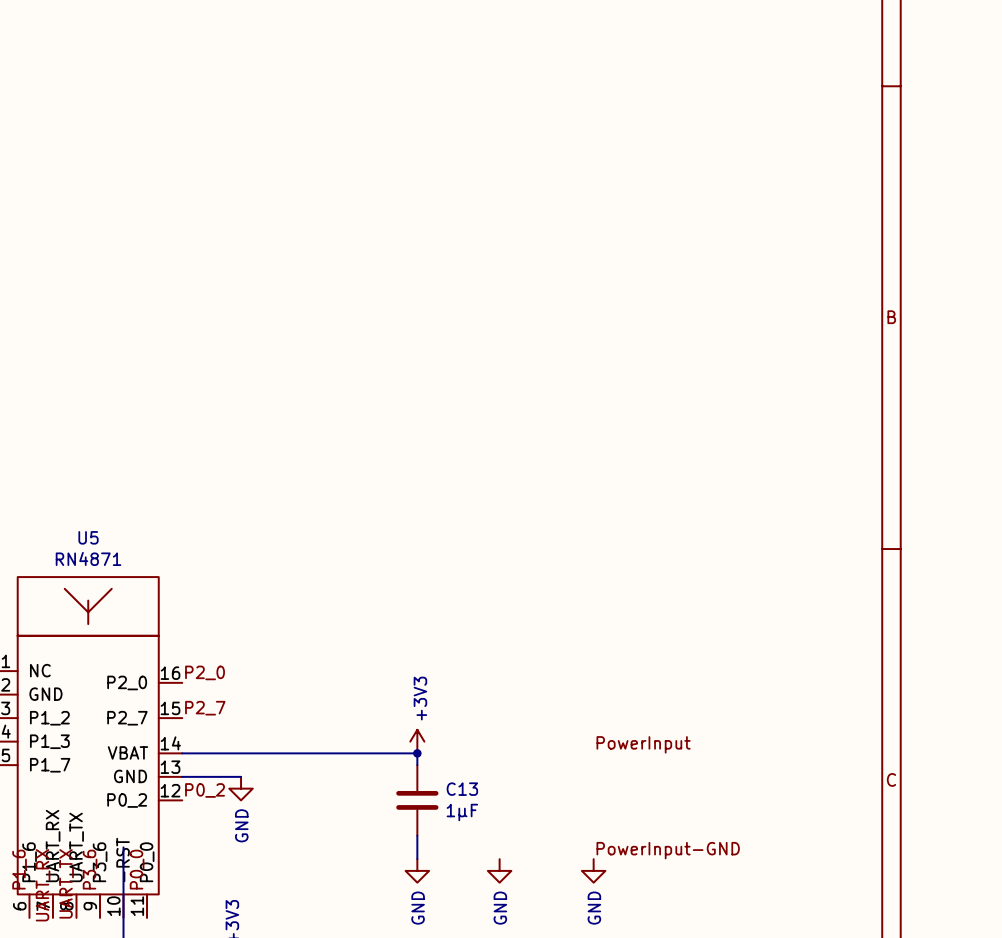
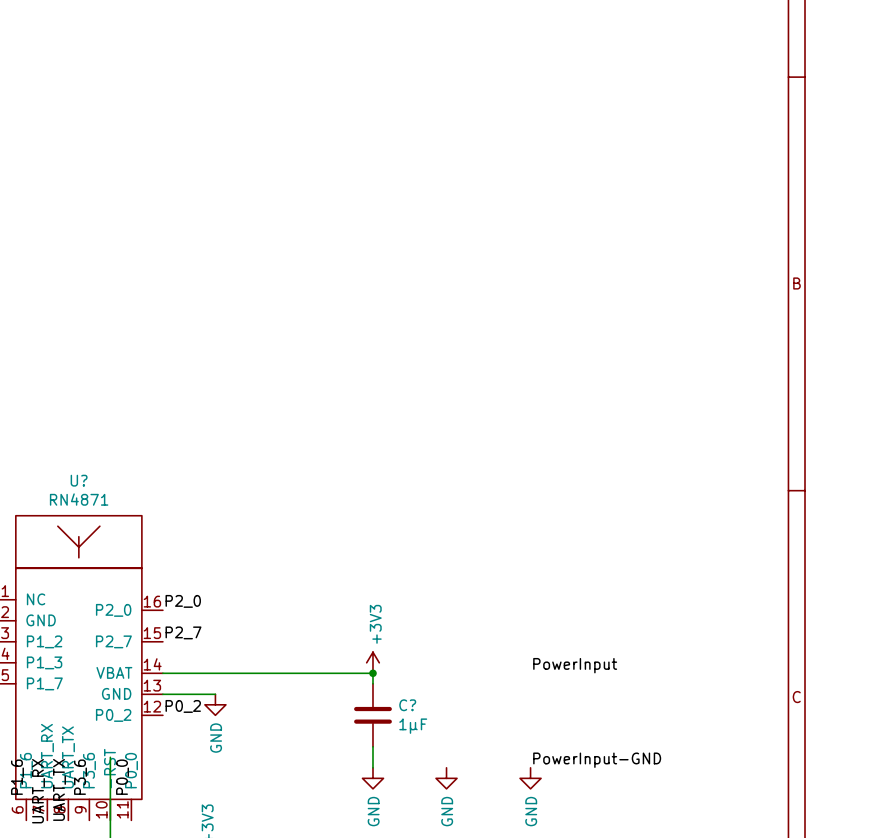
U5 name: U5 (88, 537) -> U? (79, 480)
C13 name: C13 (462, 789) -> C? (407, 705)

